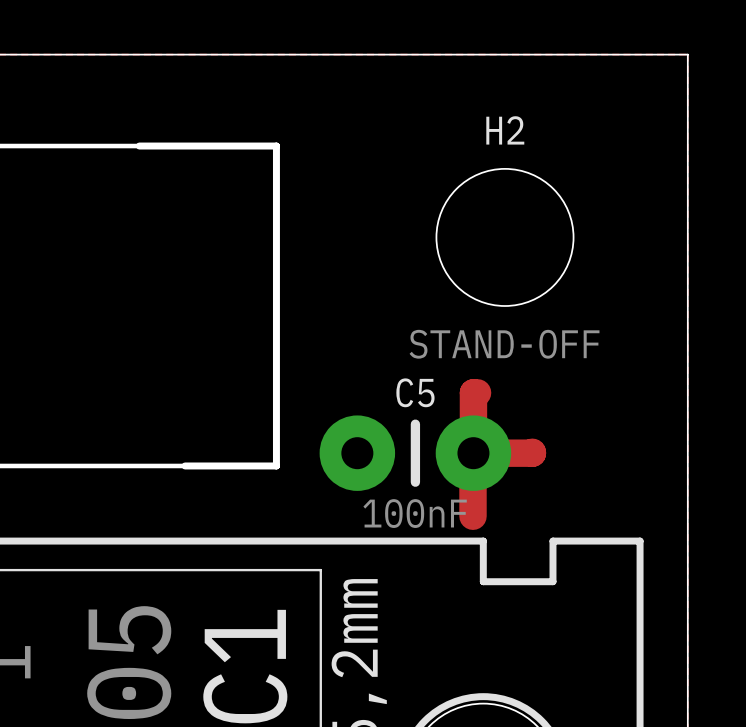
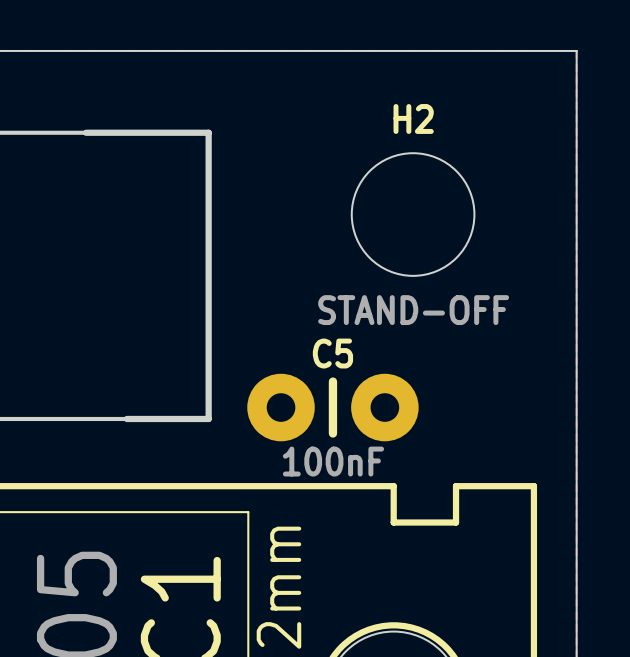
track: (477, 392) (473, 392) (473, 453) -> none
track: (532, 453) (473, 453) (473, 516) -> none

